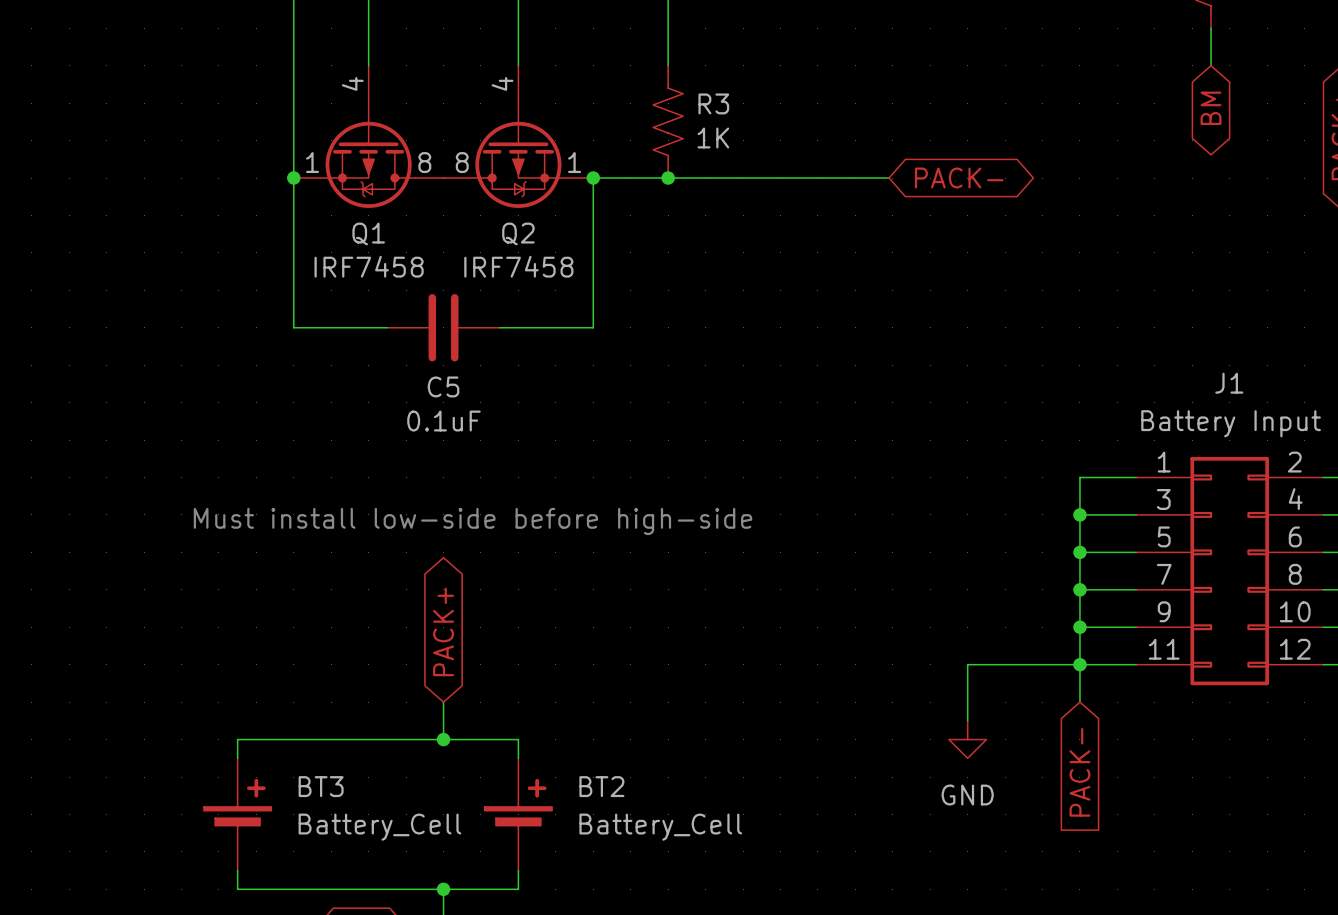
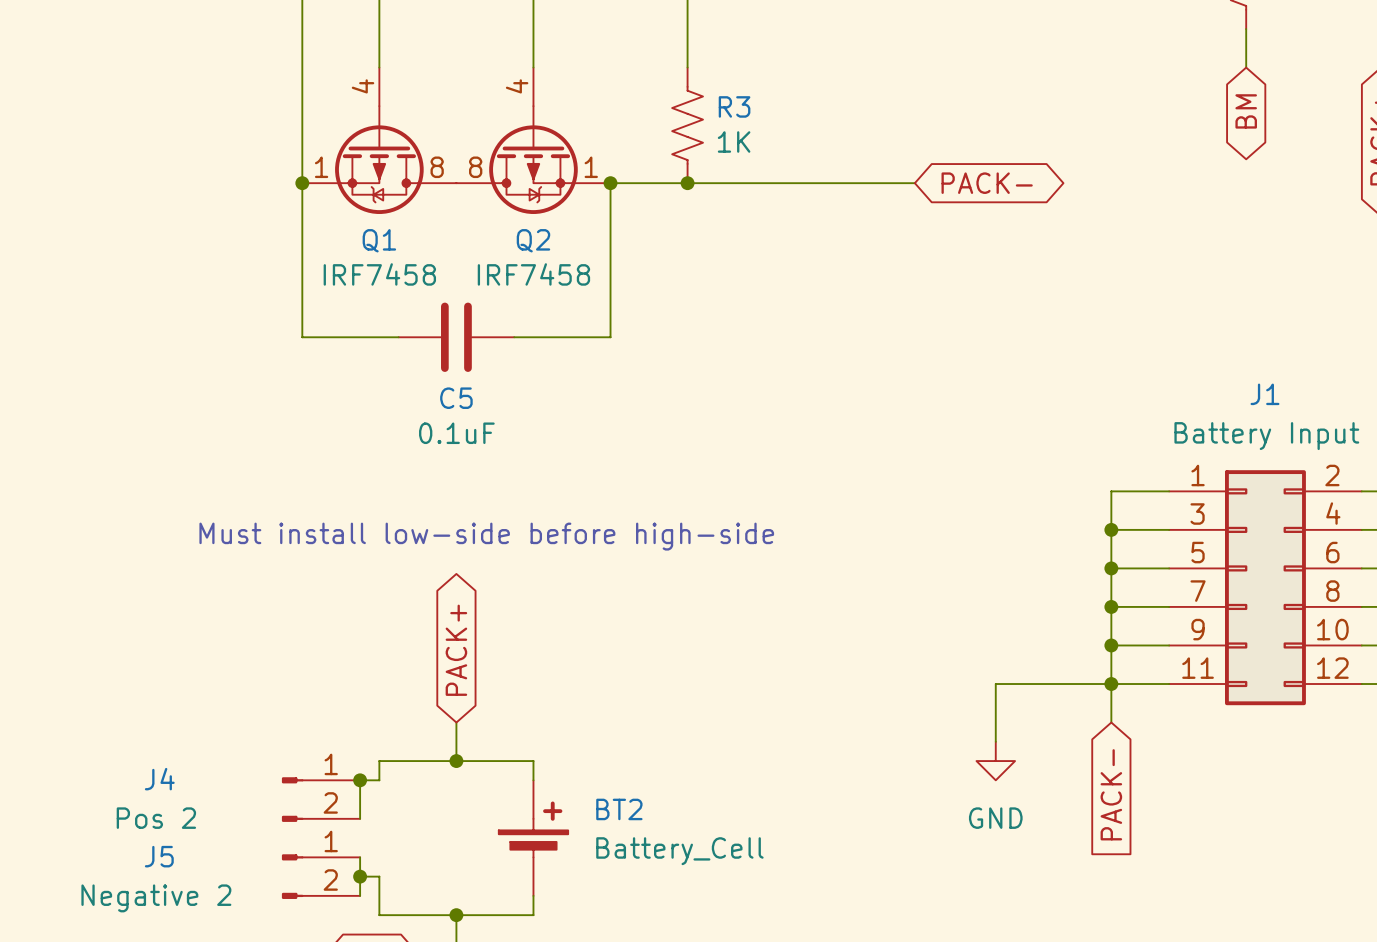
wire: (368, 739) (237, 739) (237, 758) -> (379, 761) (379, 780) (360, 780) (360, 818)
junction: none -> (360, 780)
J4: none -> Pos 2 (321, 799)
BT3: Battery_Cell (237, 814) -> none
wire: none -> (360, 857) (360, 895)
J5: none -> Negative 2 (321, 876)
junction: none -> (360, 876)
wire: (237, 870) (237, 889) (368, 889) -> (360, 876) (379, 876) (379, 915)

